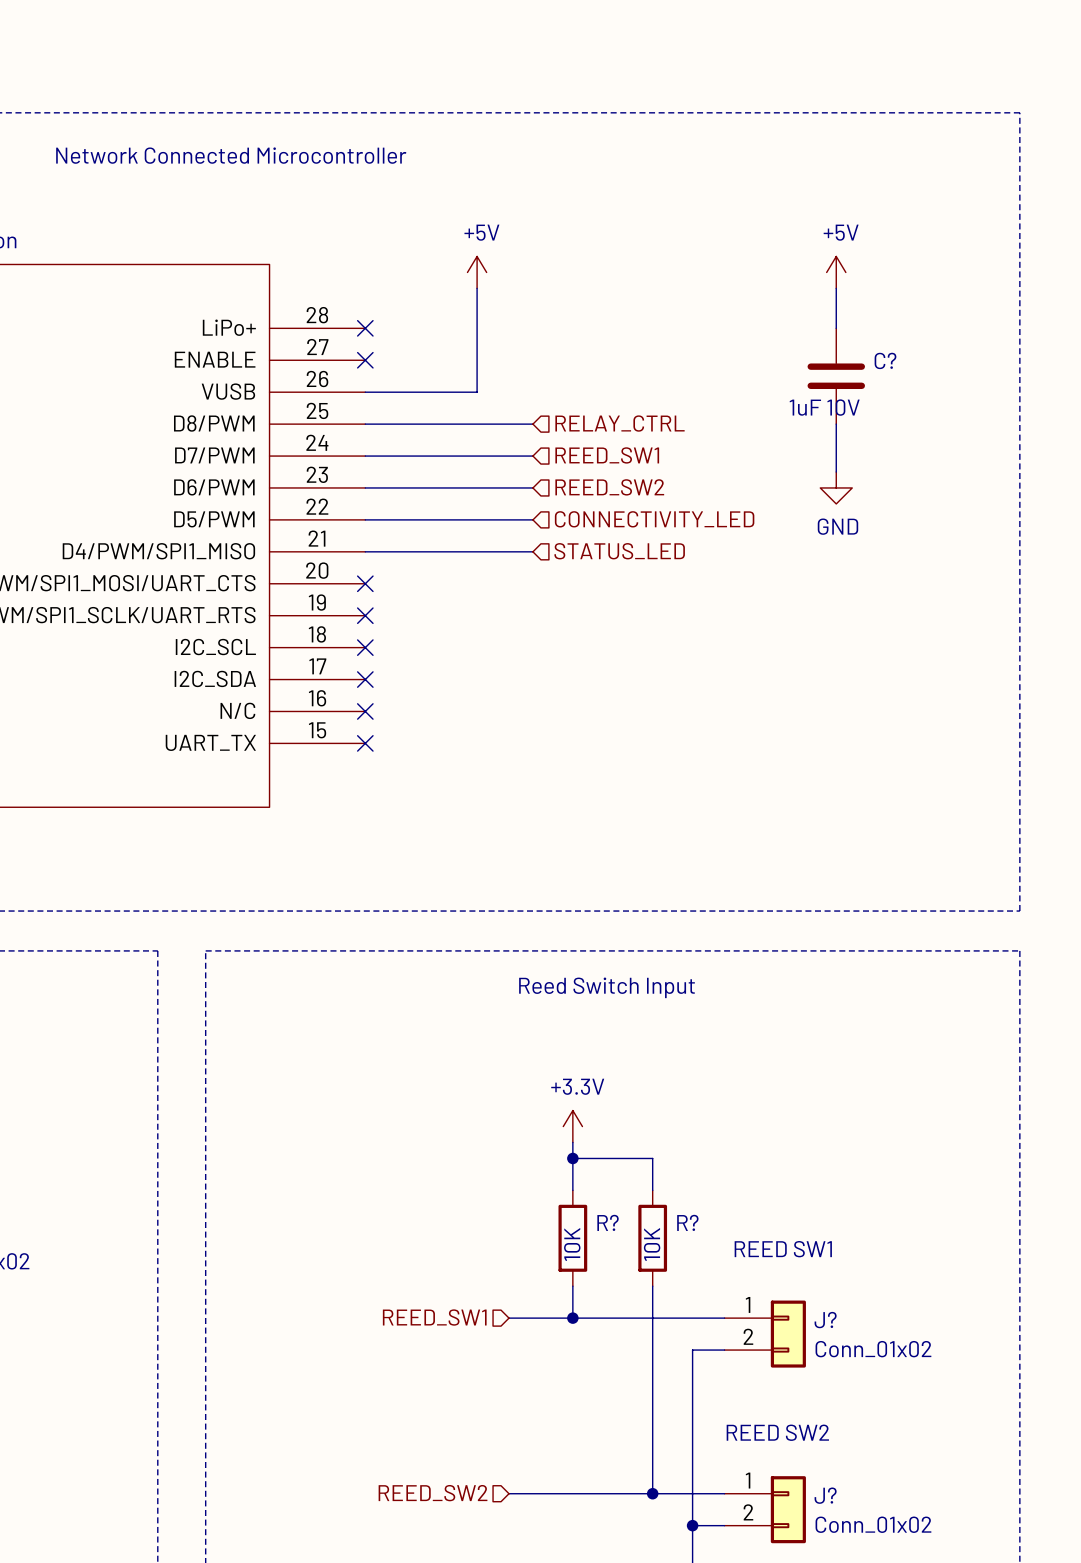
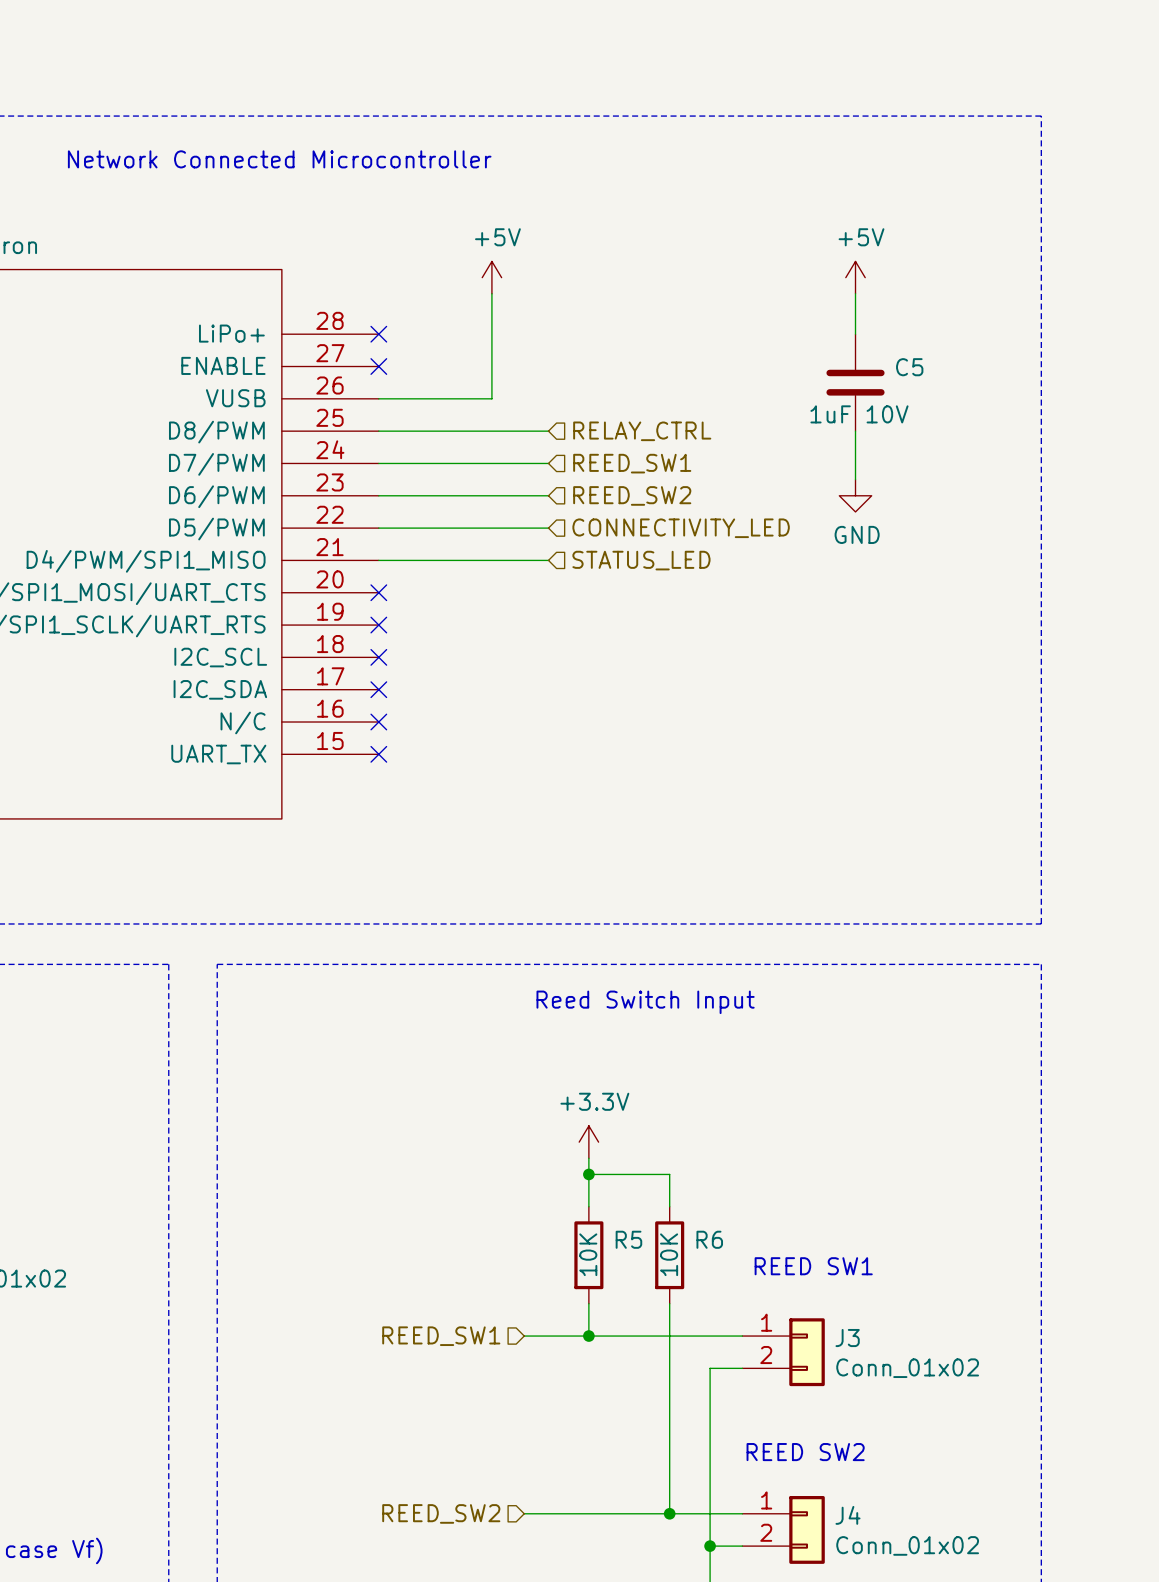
C? name: C? (885, 360) -> C5 (909, 367)
R? name: R? (608, 1222) -> R5 (628, 1239)
R? name: R? (687, 1222) -> R6 (709, 1239)
J? name: J? (825, 1320) -> J3 (847, 1338)
J? name: J? (825, 1495) -> J4 (848, 1515)

